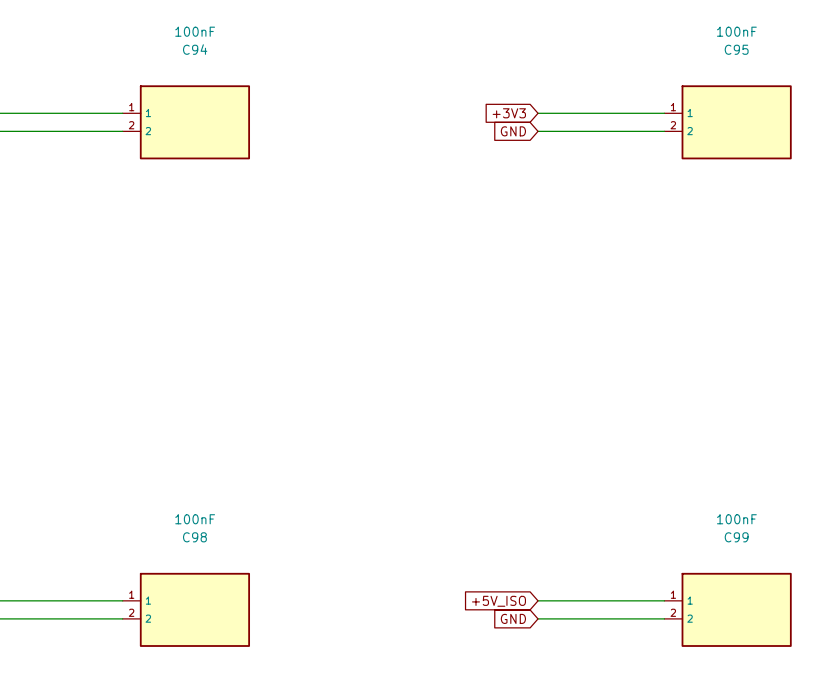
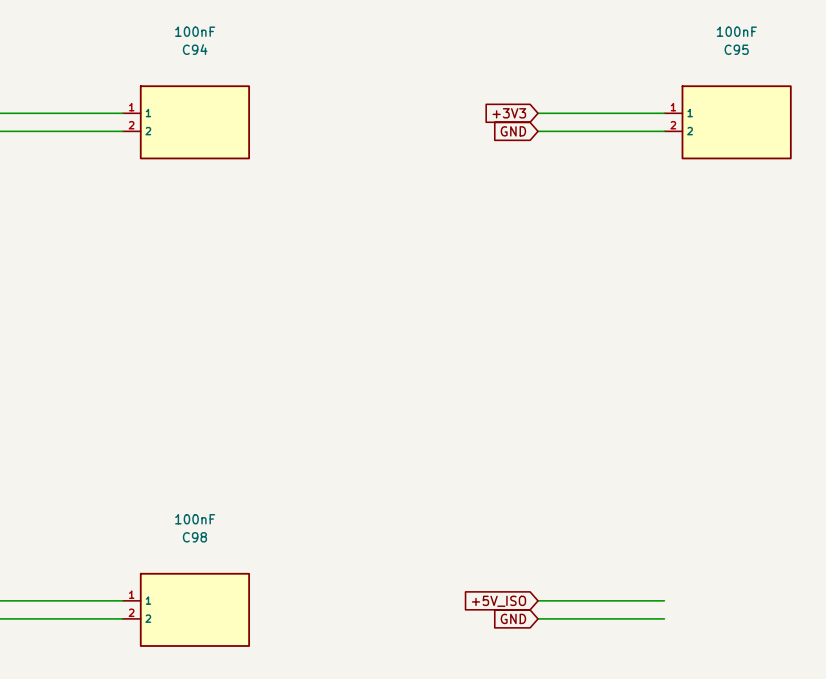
C99: 100nF (728, 609) -> none

